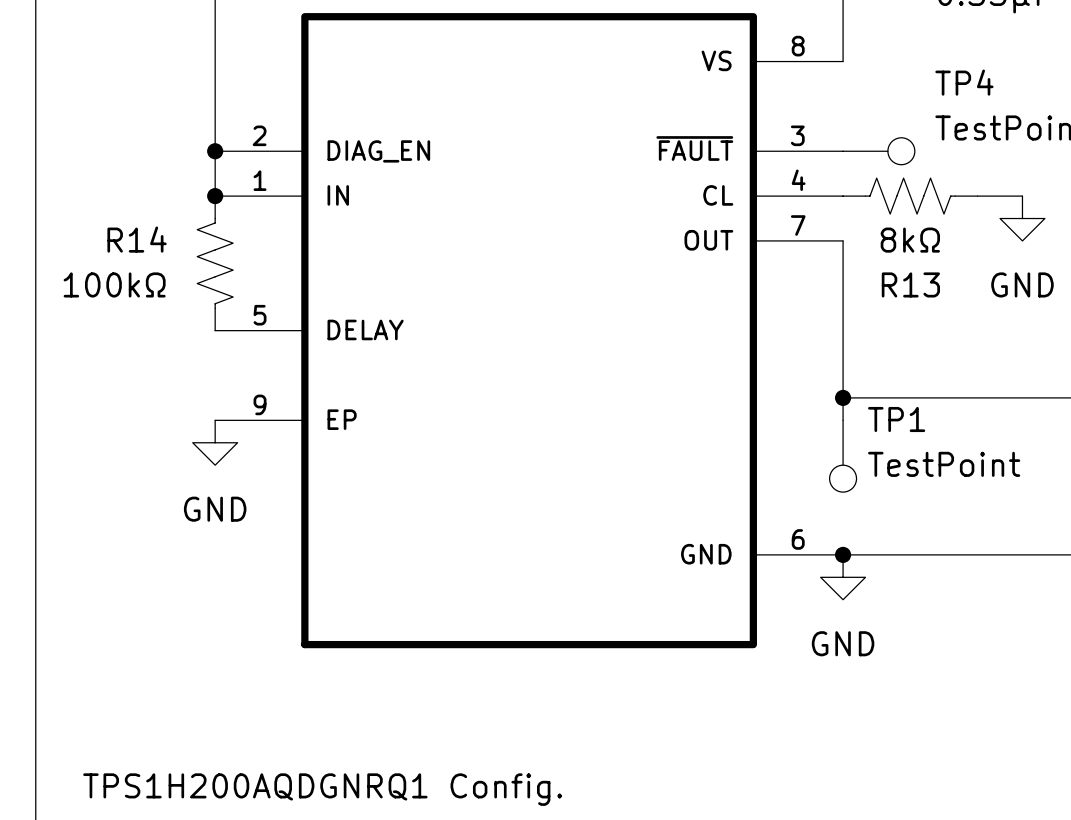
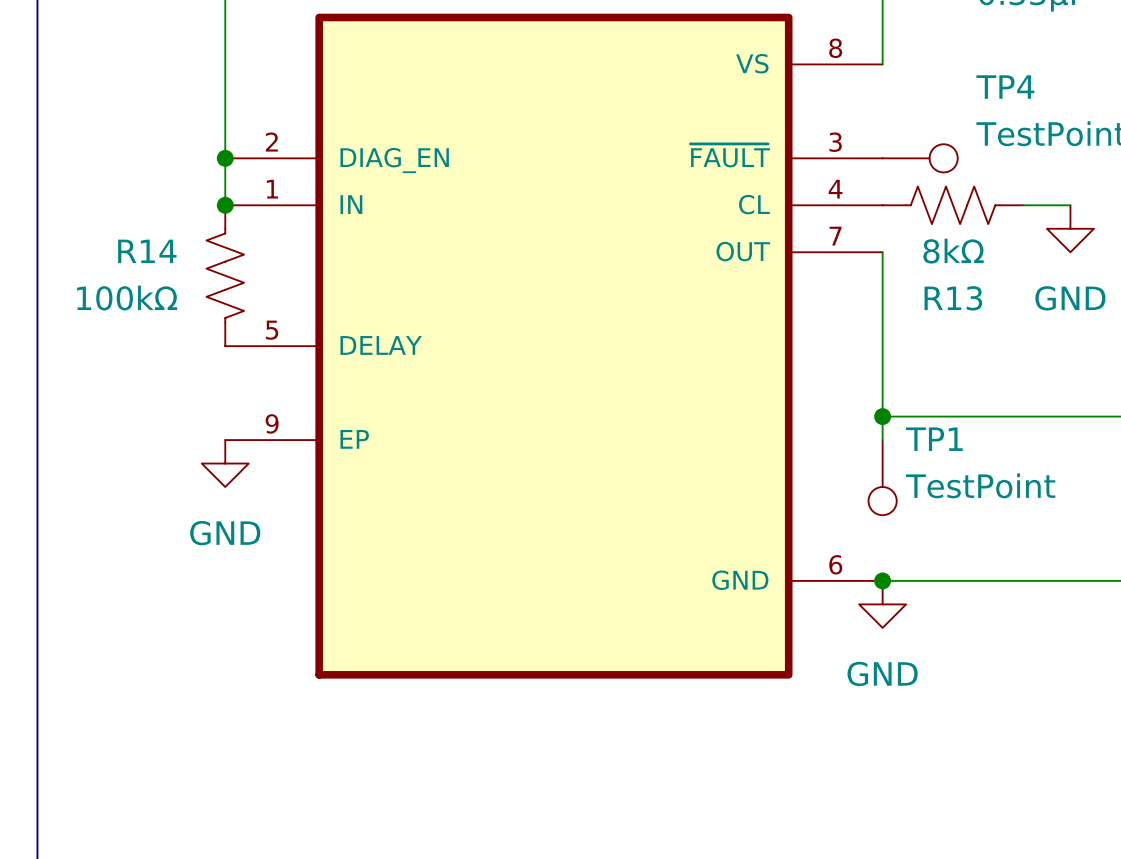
text: TPS1H200AQDGNRQ1 Config. (322, 789) -> none

